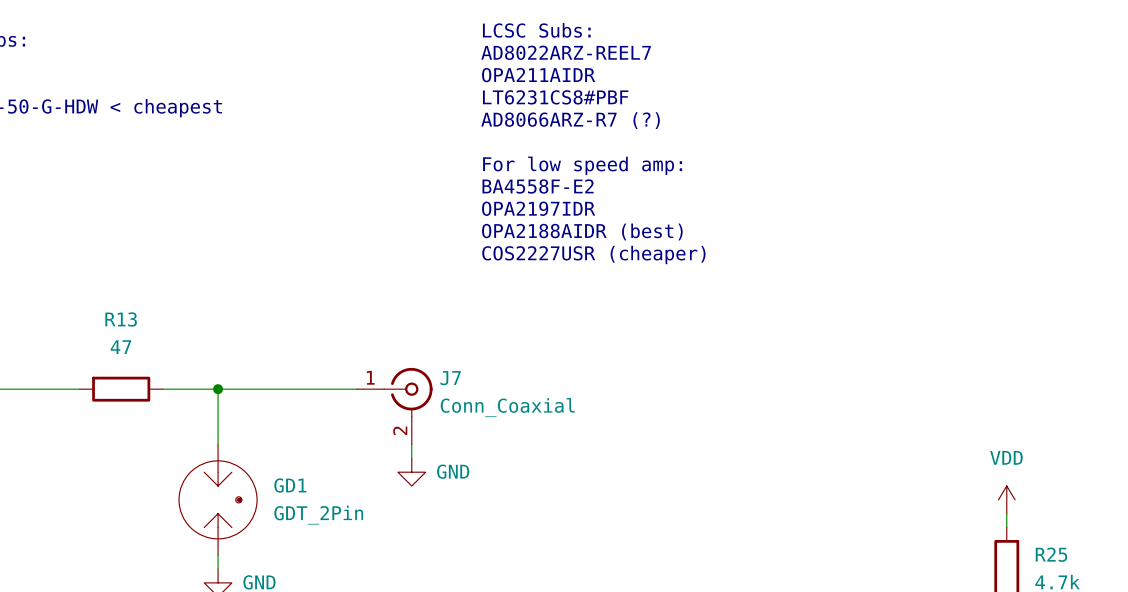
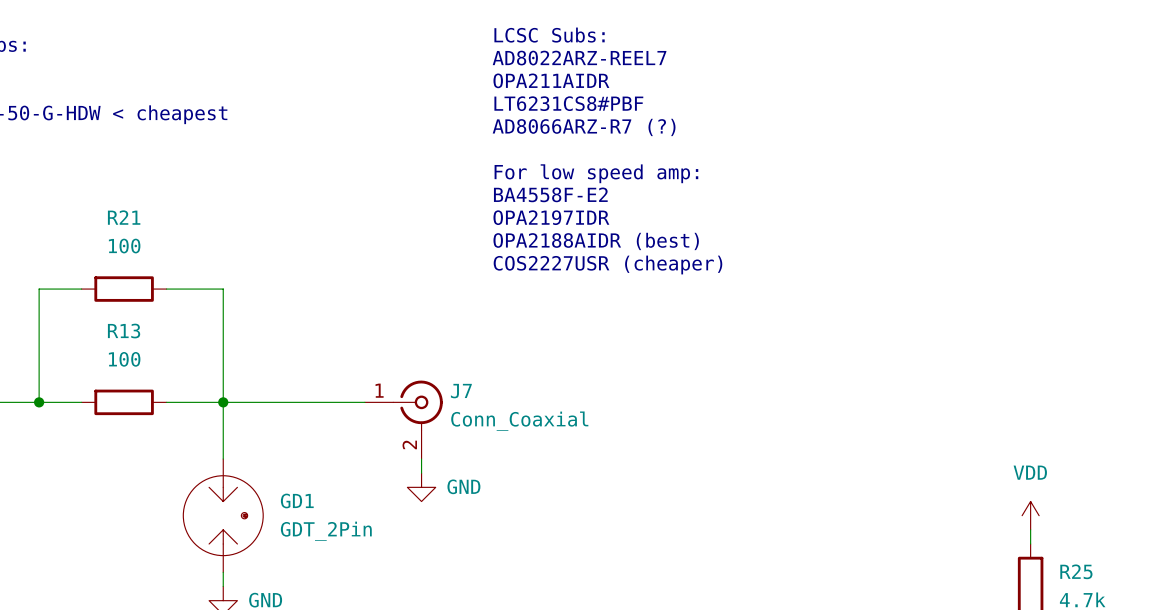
wire: none -> (81, 289) (39, 289) (39, 402)
R21: none -> 100 (124, 289)
wire: none -> (166, 289) (223, 289) (223, 402)
R13 value: 47 (120, 347) -> 100 (124, 359)
junction: none -> (39, 402)

